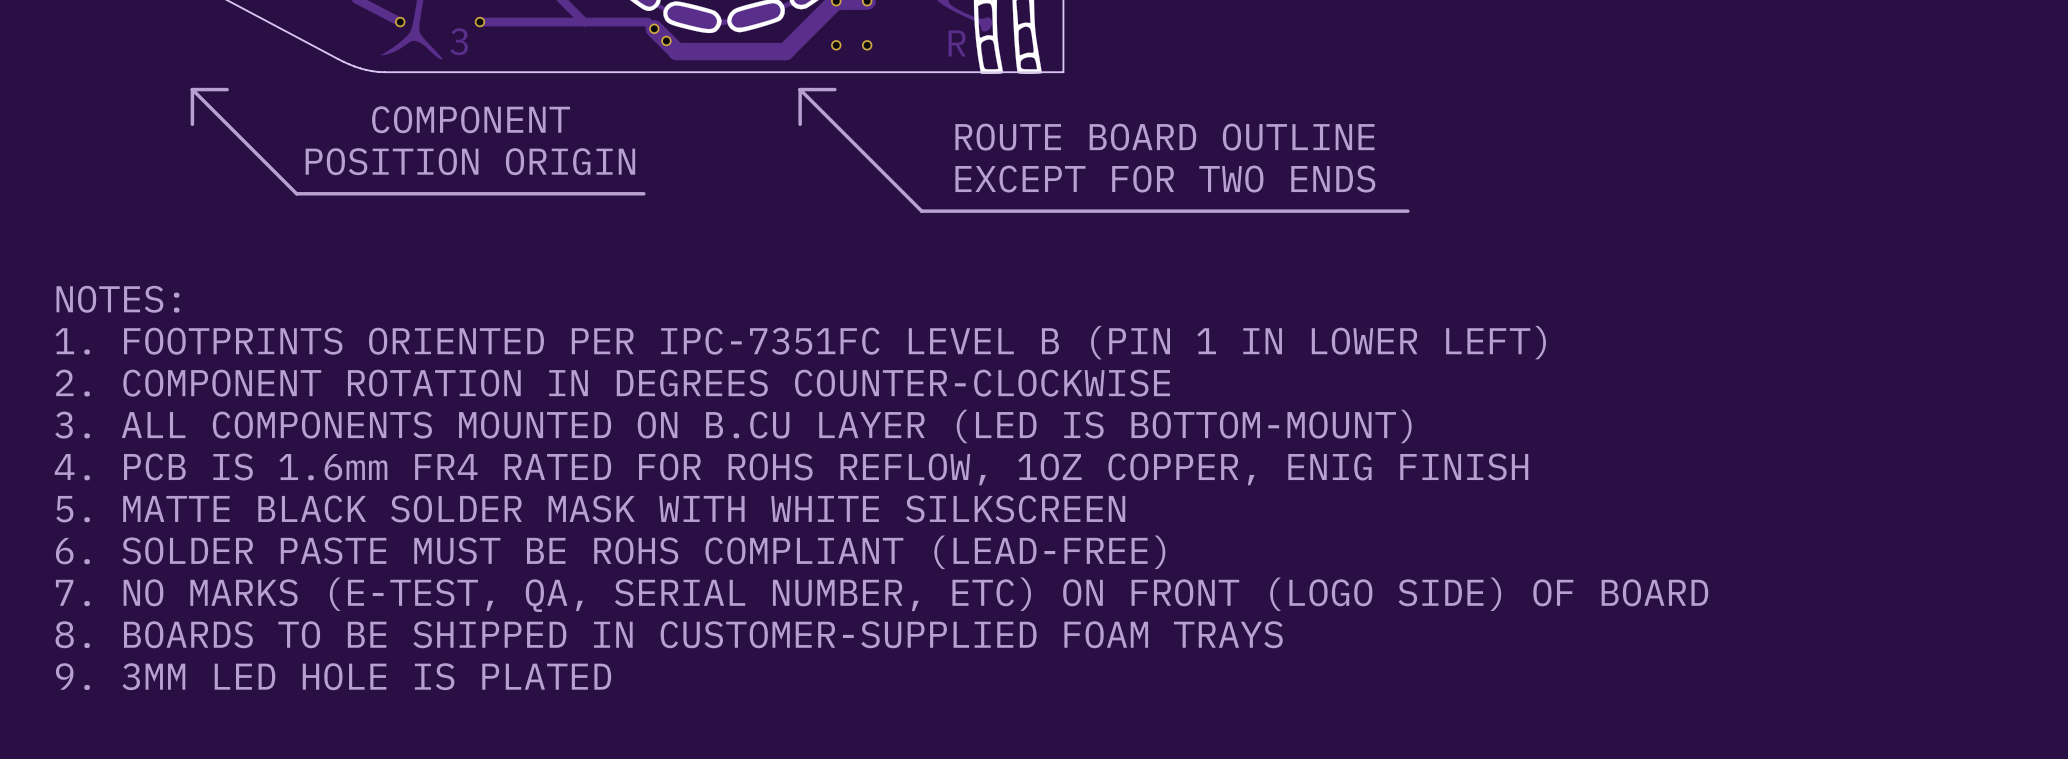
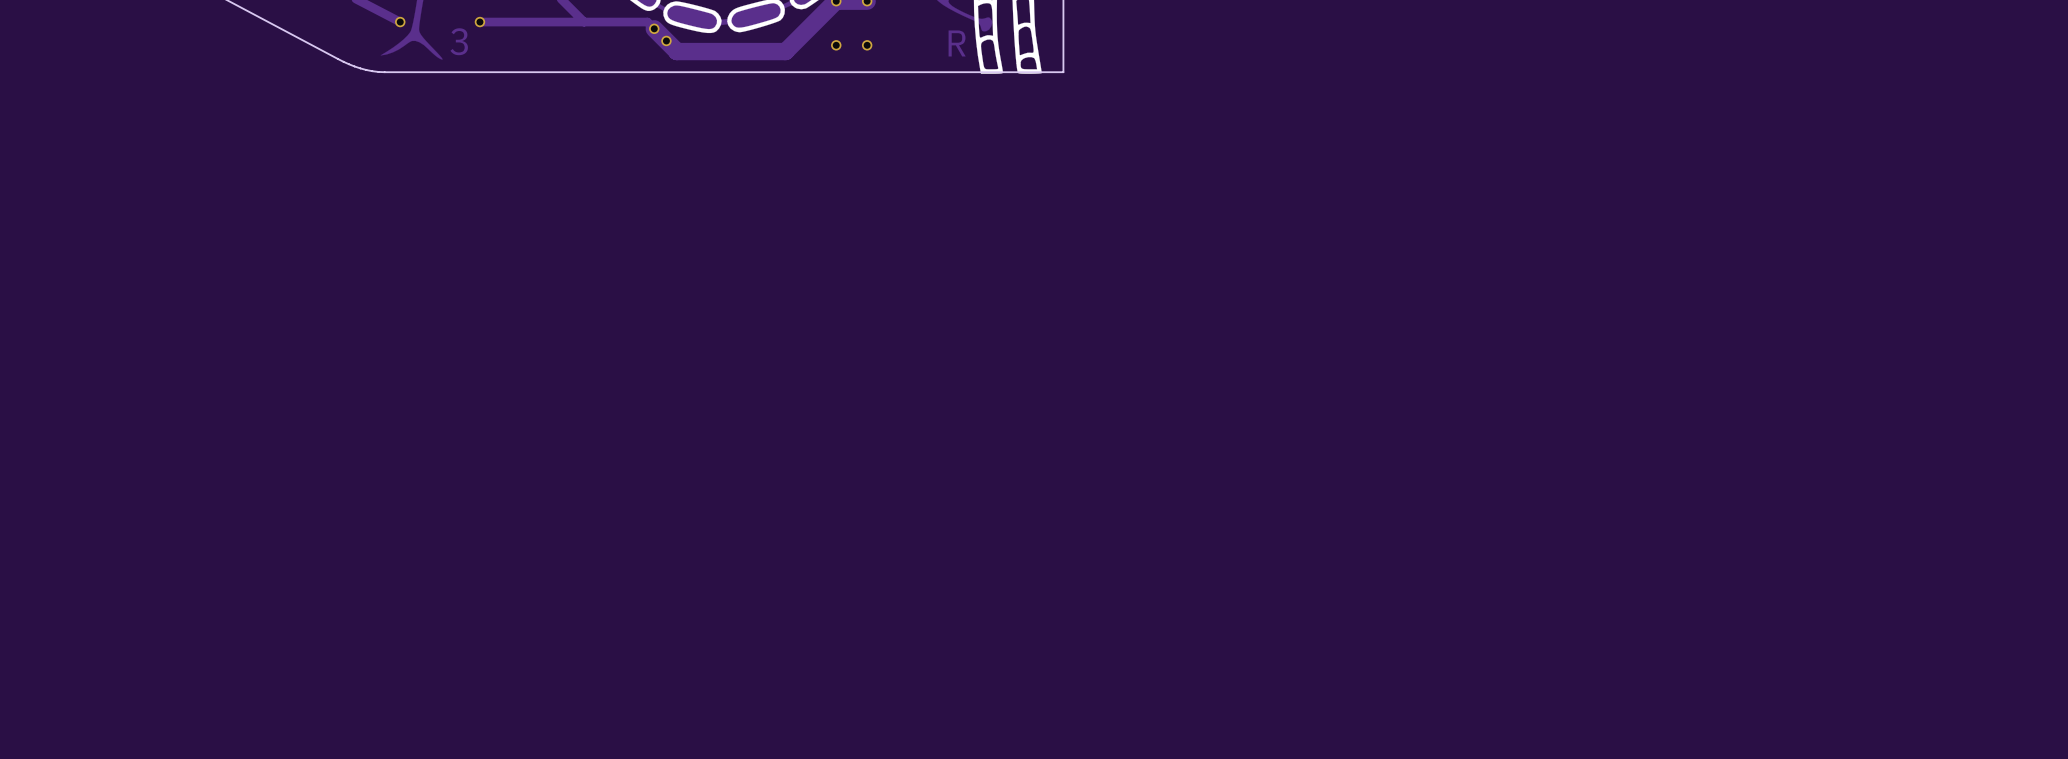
line: (192, 89) (227, 89) -> none
line: (192, 89) (192, 124) -> none
line: (192, 89) (296, 193) (643, 193) -> none
line: (800, 89) (921, 211) (1407, 211) -> none
line: (800, 89) (800, 124) -> none
line: (800, 89) (834, 89) -> none
text: COMPONENT (471, 119) -> none
text: ROUTE BOARD OUTLINE (1164, 137) -> none
text: POSITION ORIGIN (470, 161) -> none
text: EXCEPT FOR TWO ENDS (1165, 179) -> none
text: NOTES: (117, 299) -> none
text: 1. FOOTPRINTS ORIENTED PER IPC-7351FC LEVEL B (PIN 1 IN LOWER LEFT) (800, 342) -> none
text: 2. COMPONENT ROTATION IN DEGREES COUNTER-CLOCKWISE (612, 383) -> none
text: 3. ALL COMPONENTS MOUNTED ON B.CU LAYER (LED IS BOTTOM-MOUNT) (733, 426) -> none
text: 4. PCB IS 1.6mm FR4 RATED FOR ROHS REFLOW, 1OZ COPPER, ENIG FINISH (791, 469) -> none
text: 5. MATTE BLACK SOLDER MASK WITH WHITE SILKSCREEN (590, 508) -> none
text: 6. SOLDER PASTE MUST BE ROHS COMPLIANT (LEAD-FREE) (610, 552) -> none
text: 7. NO MARKS (E-TEST, QA, SERIAL NUMBER, ETC) ON FRONT (LOGO SIDE) OF BOARD (882, 594) -> none
text: 8. BOARDS TO BE SHIPPED IN CUSTOMER-SUPPLIED FOAM TRAYS (669, 634) -> none
text: 9. 3MM LED HOLE IS PLATED (333, 676) -> none

